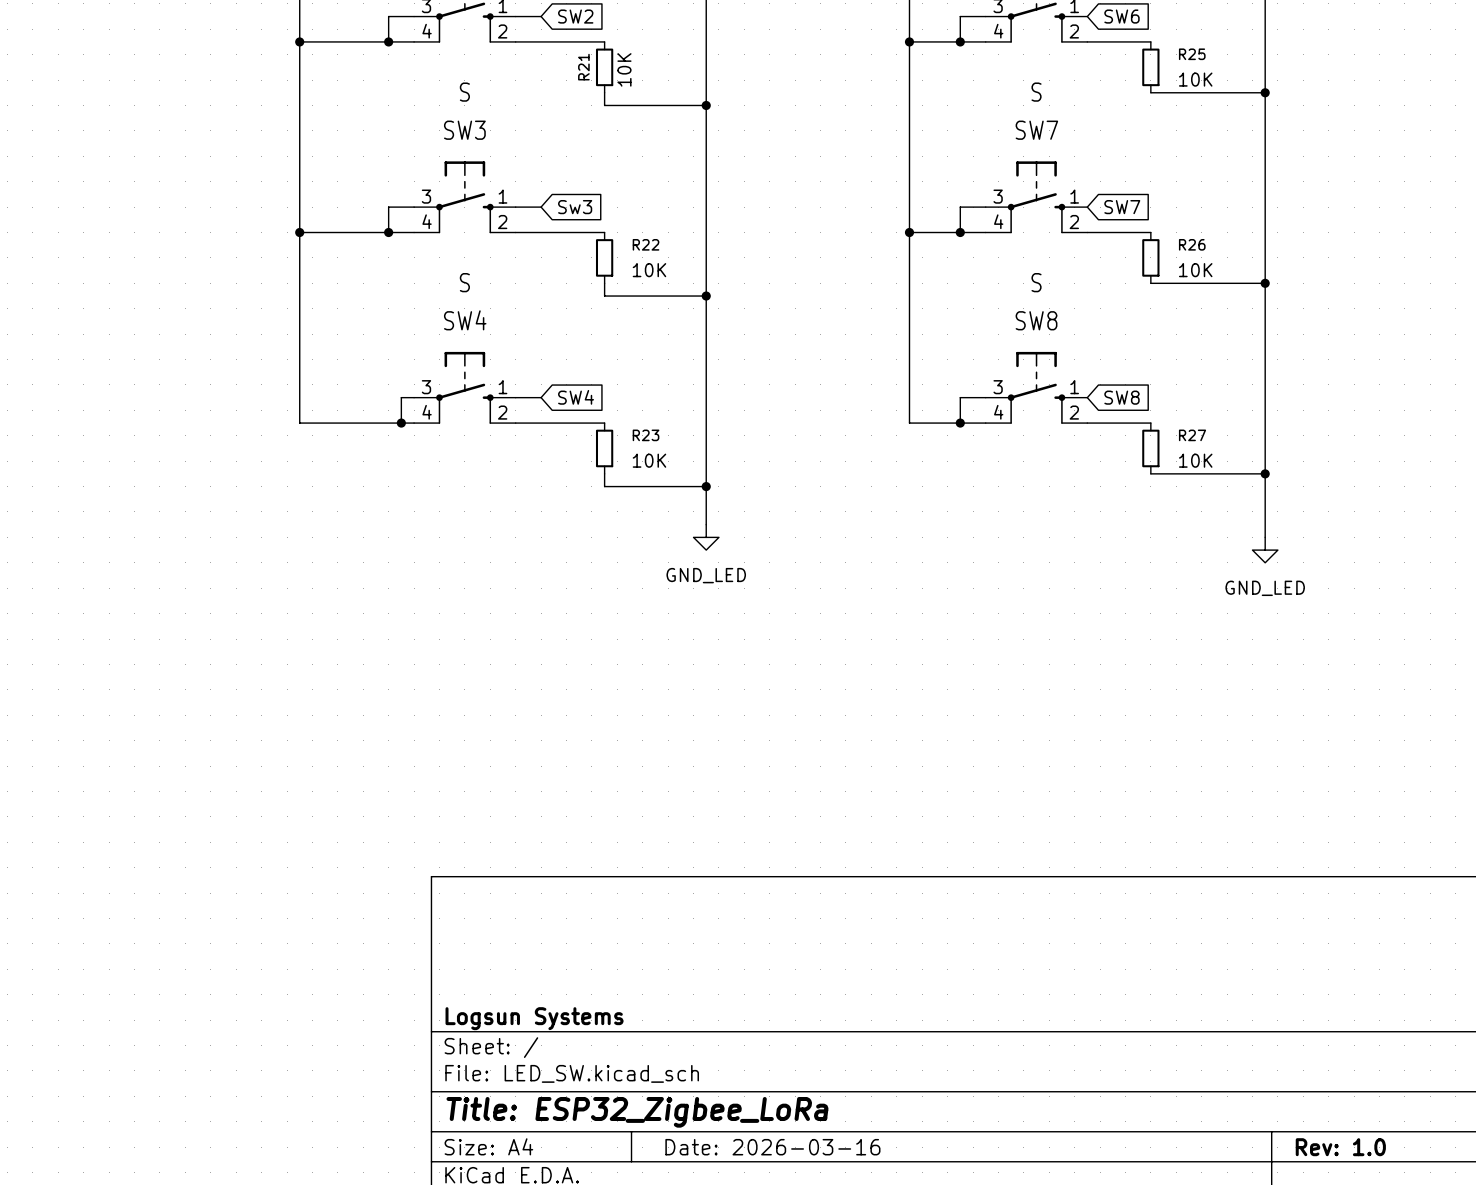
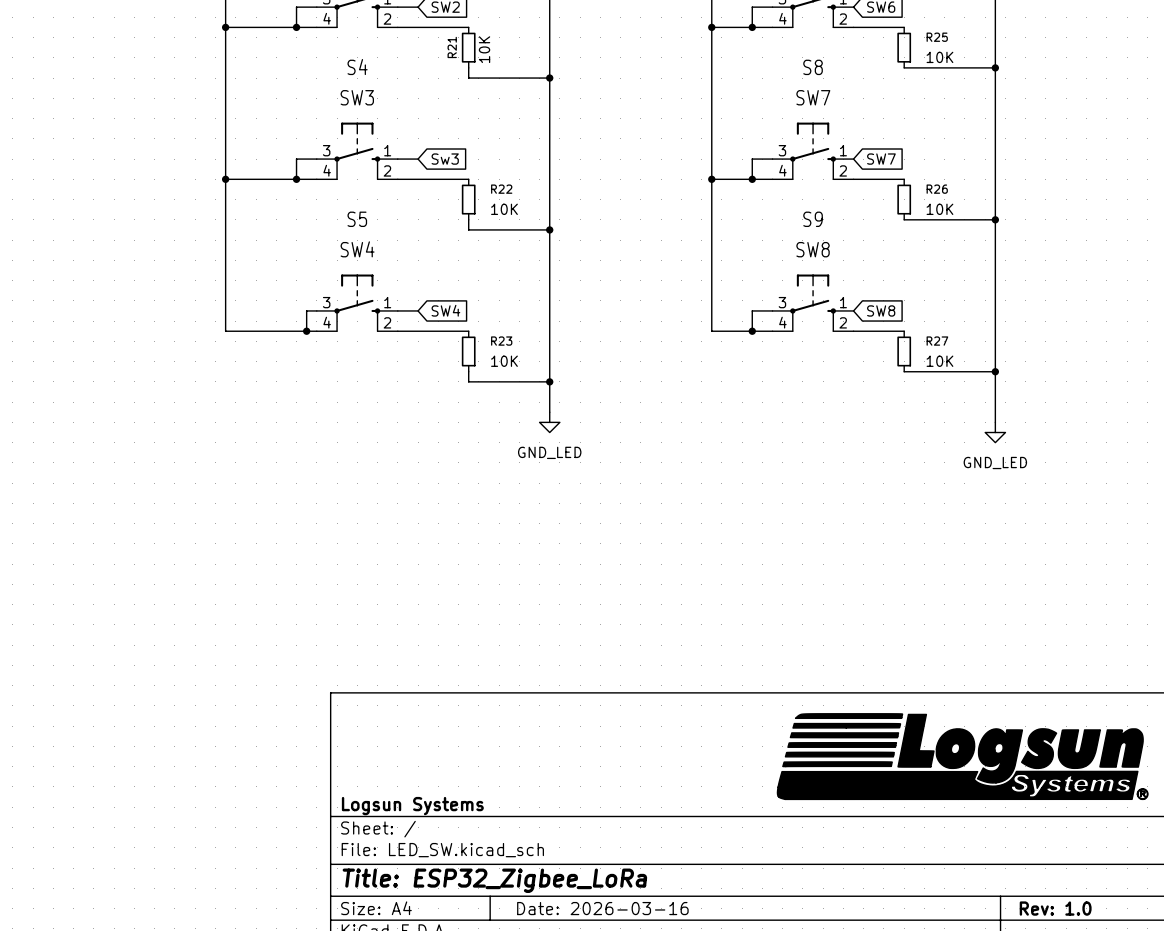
S name: S (464, 92) -> S4 (357, 67)
S name: S (1036, 92) -> S8 (813, 67)
S name: S (464, 282) -> S5 (357, 219)
S name: S (1036, 282) -> S9 (813, 219)
power symbol: none -> (962, 756)

